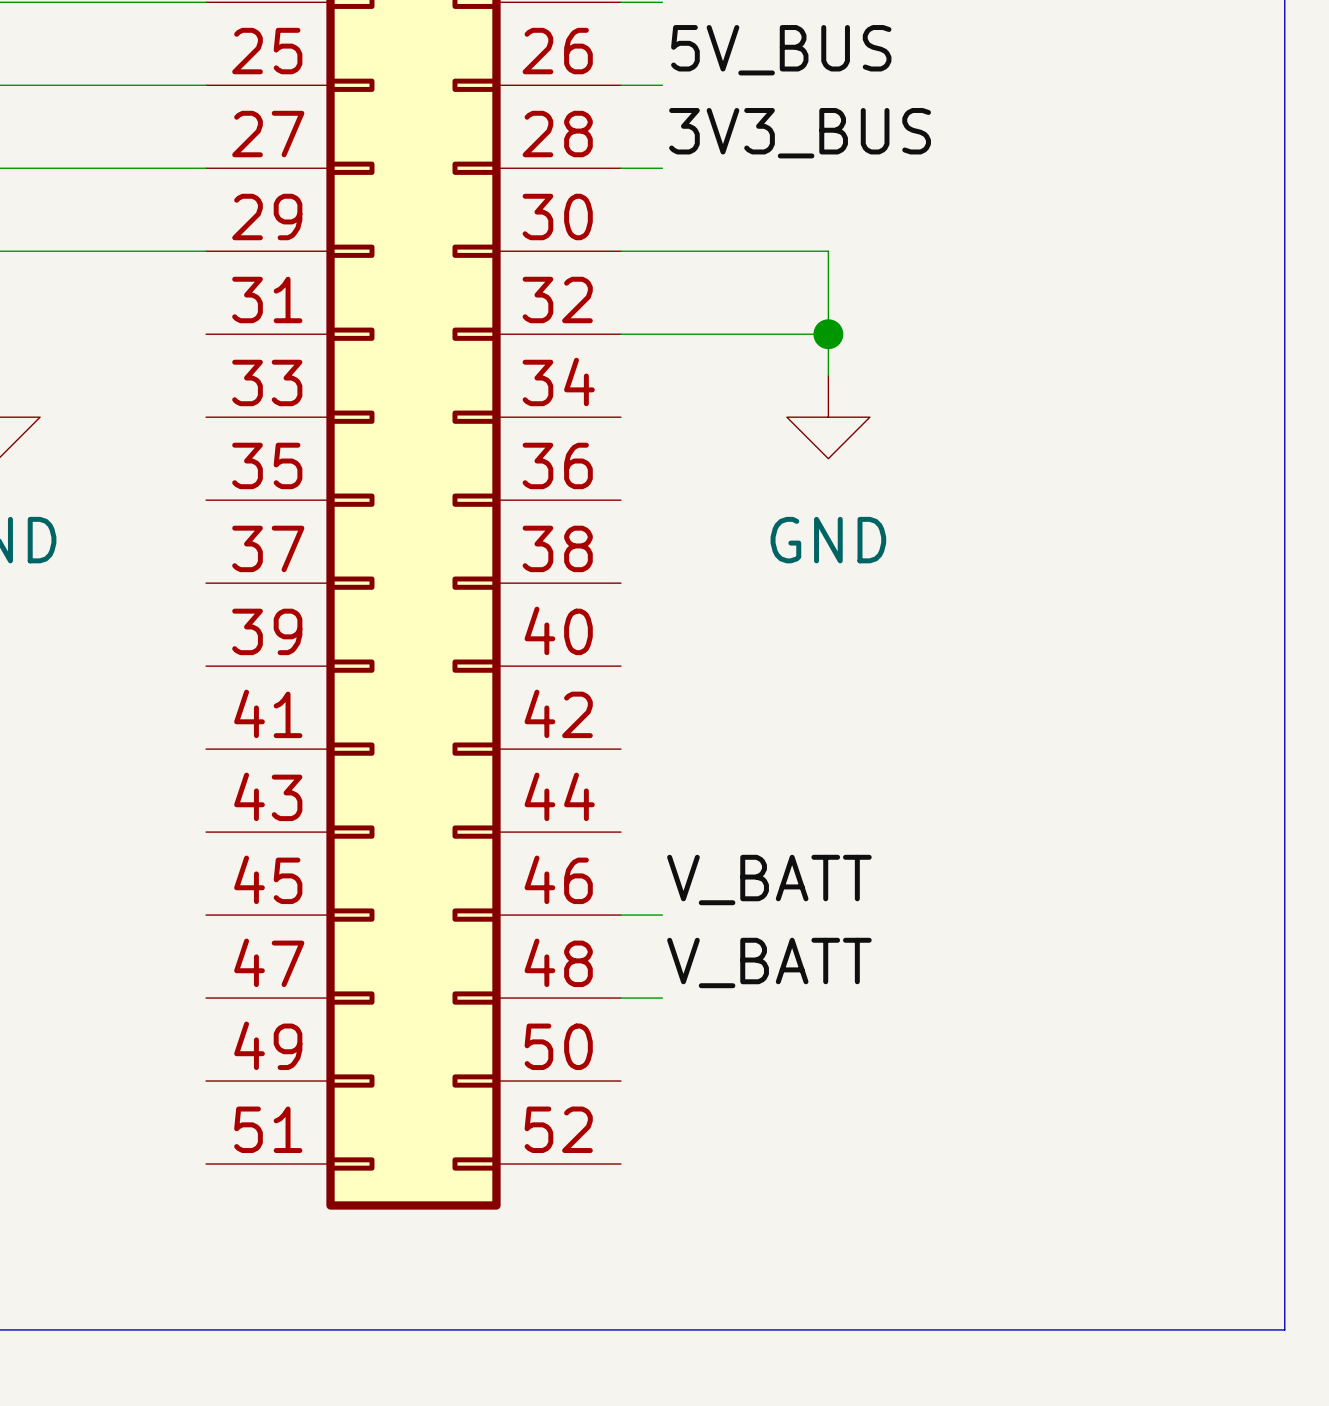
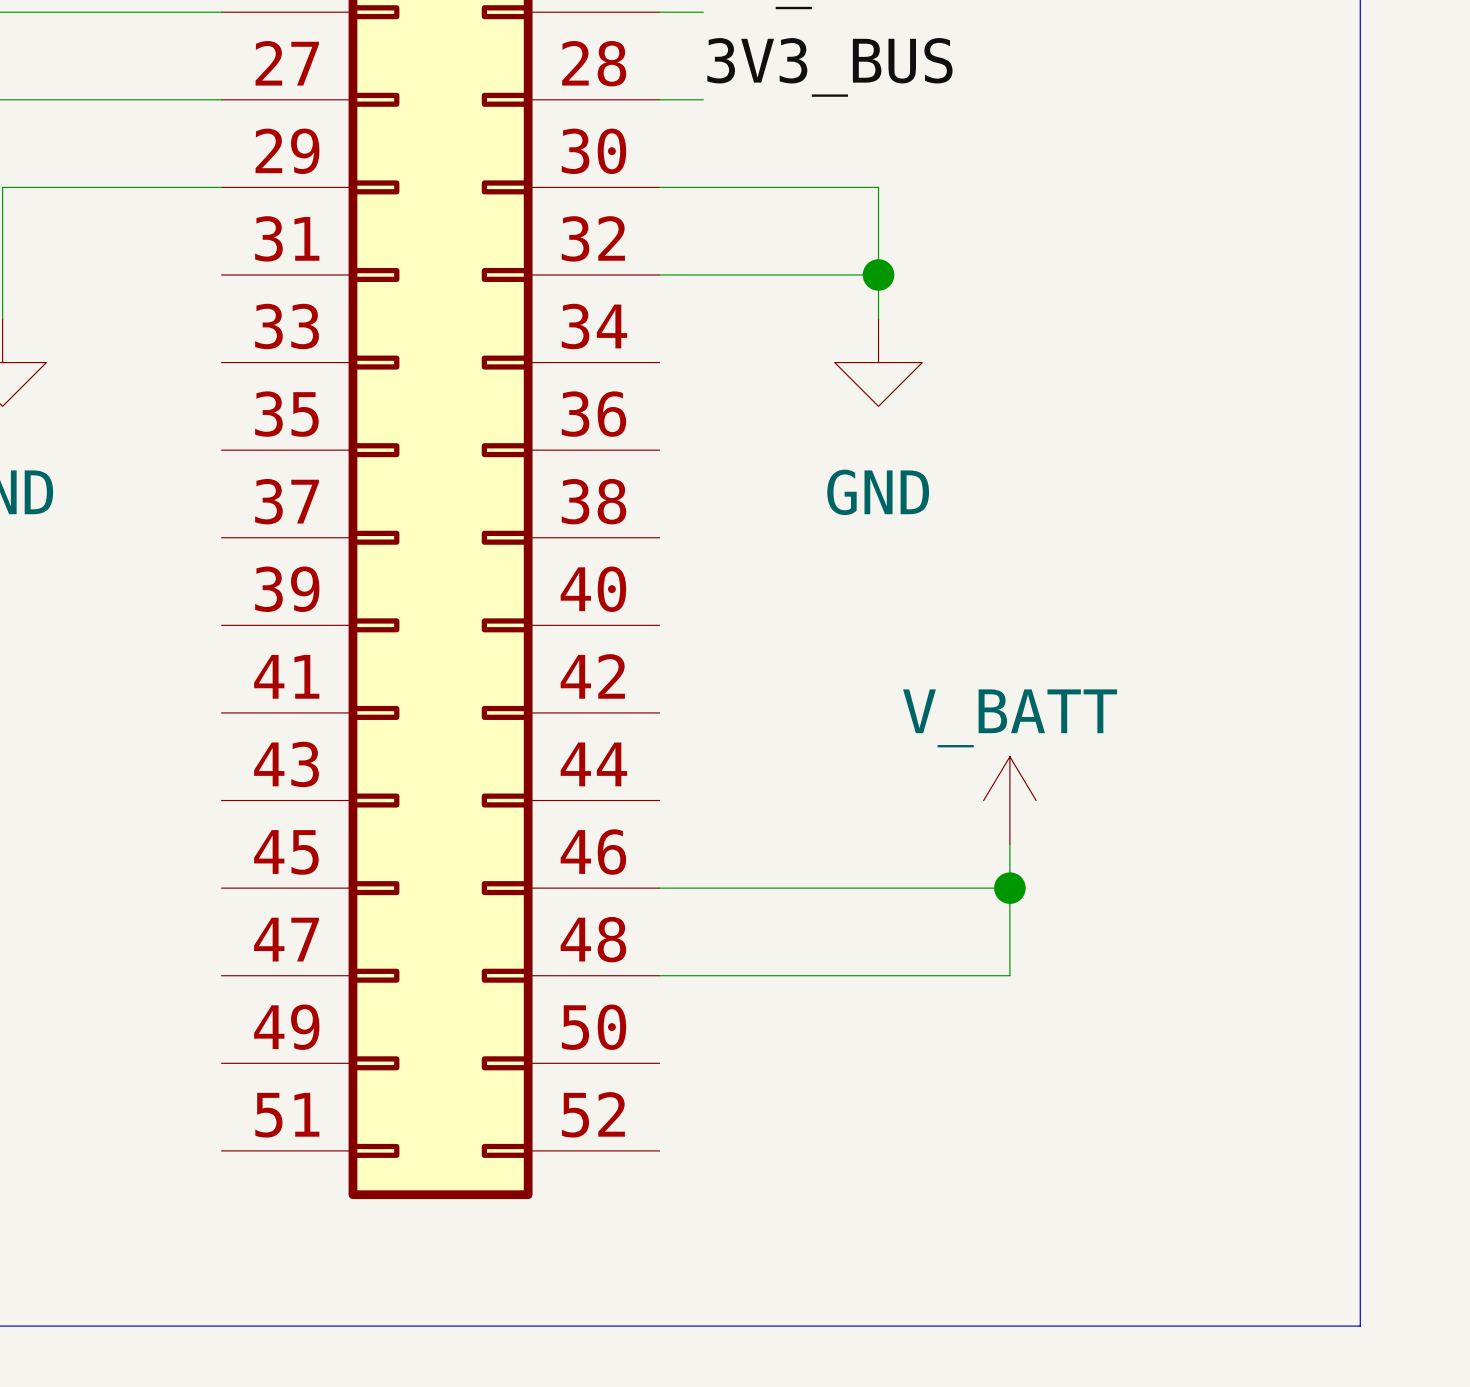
power symbol: none -> V_BATT (1009, 800)
wire: none -> (1009, 844) (1009, 975) (703, 975)
label: V_BATT (769, 880) -> none
wire: none -> (703, 888) (1009, 888)
junction: none -> (1009, 888)
label: V_BATT (769, 962) -> none

